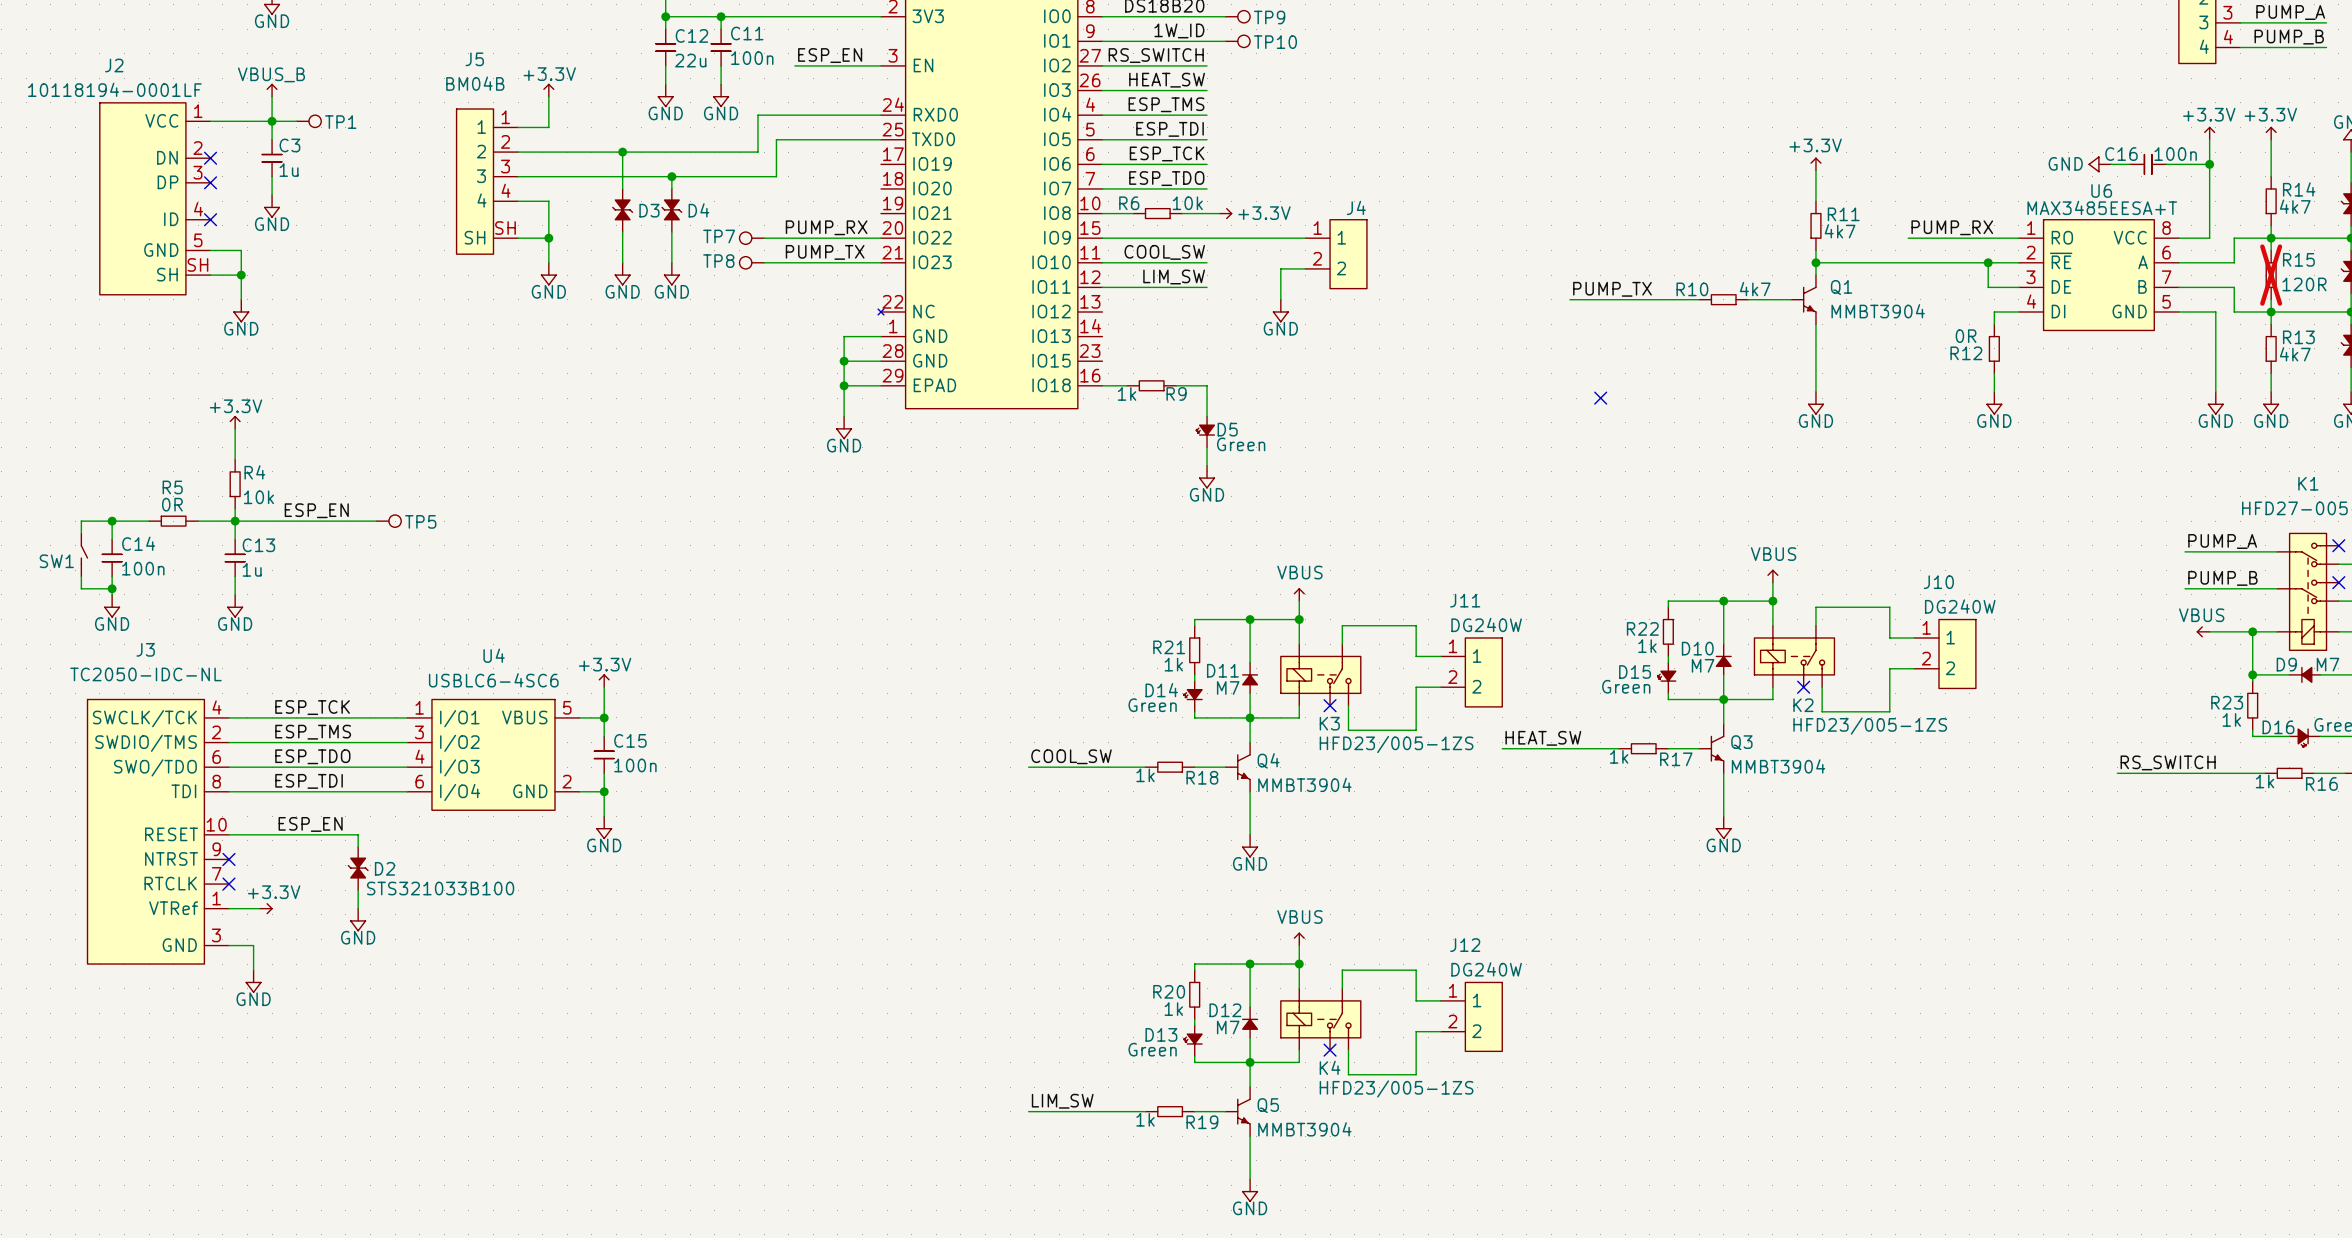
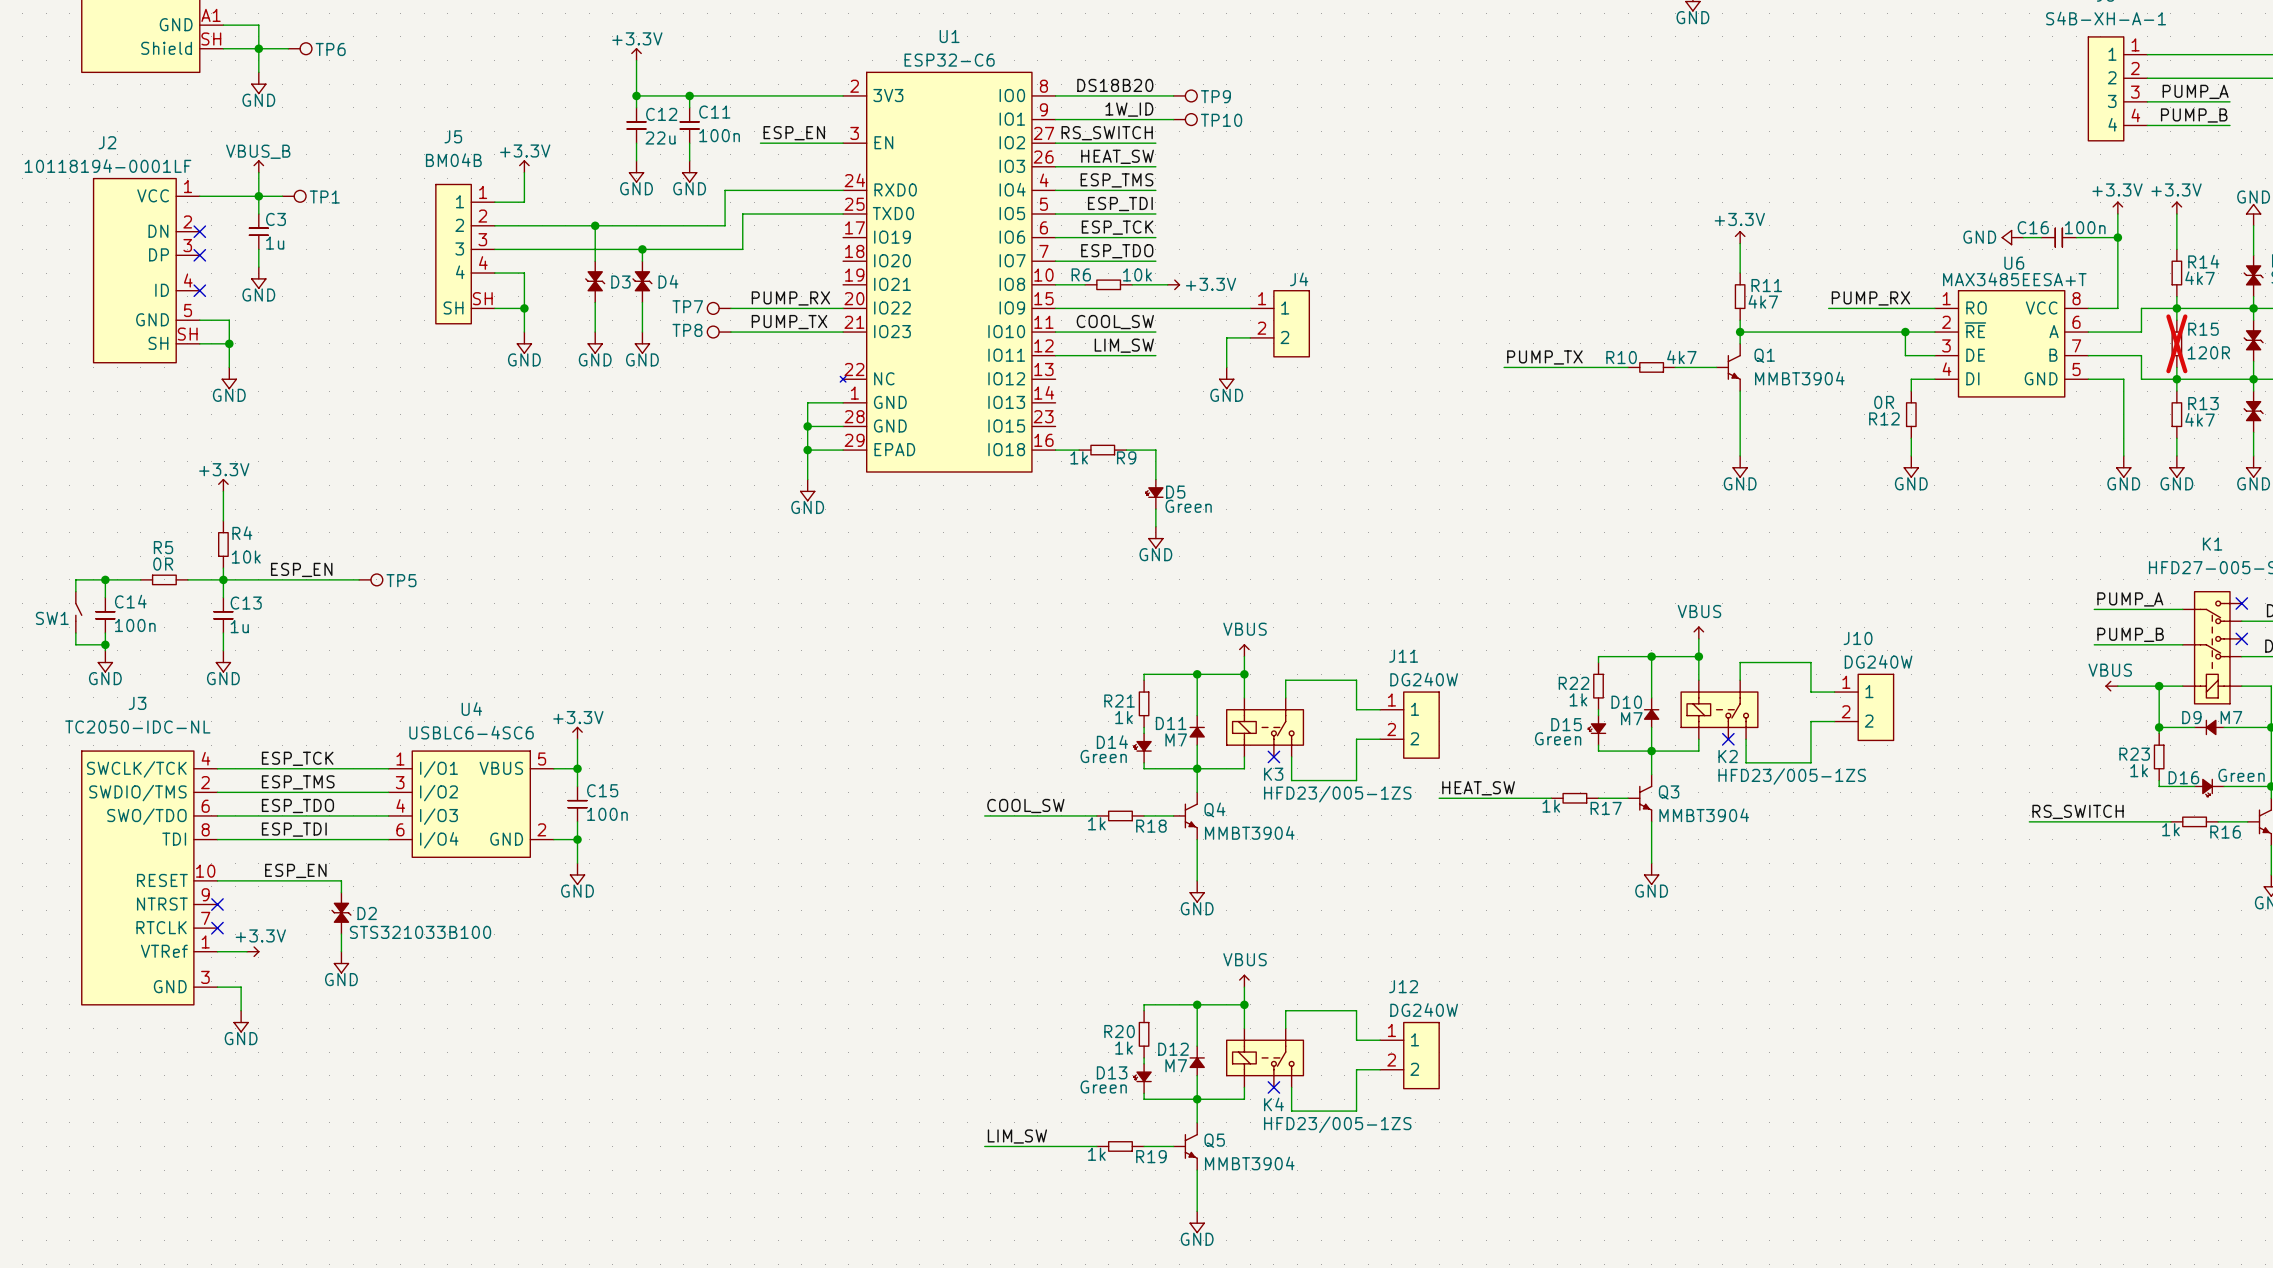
no-connect mark: (1600, 398) -> none

